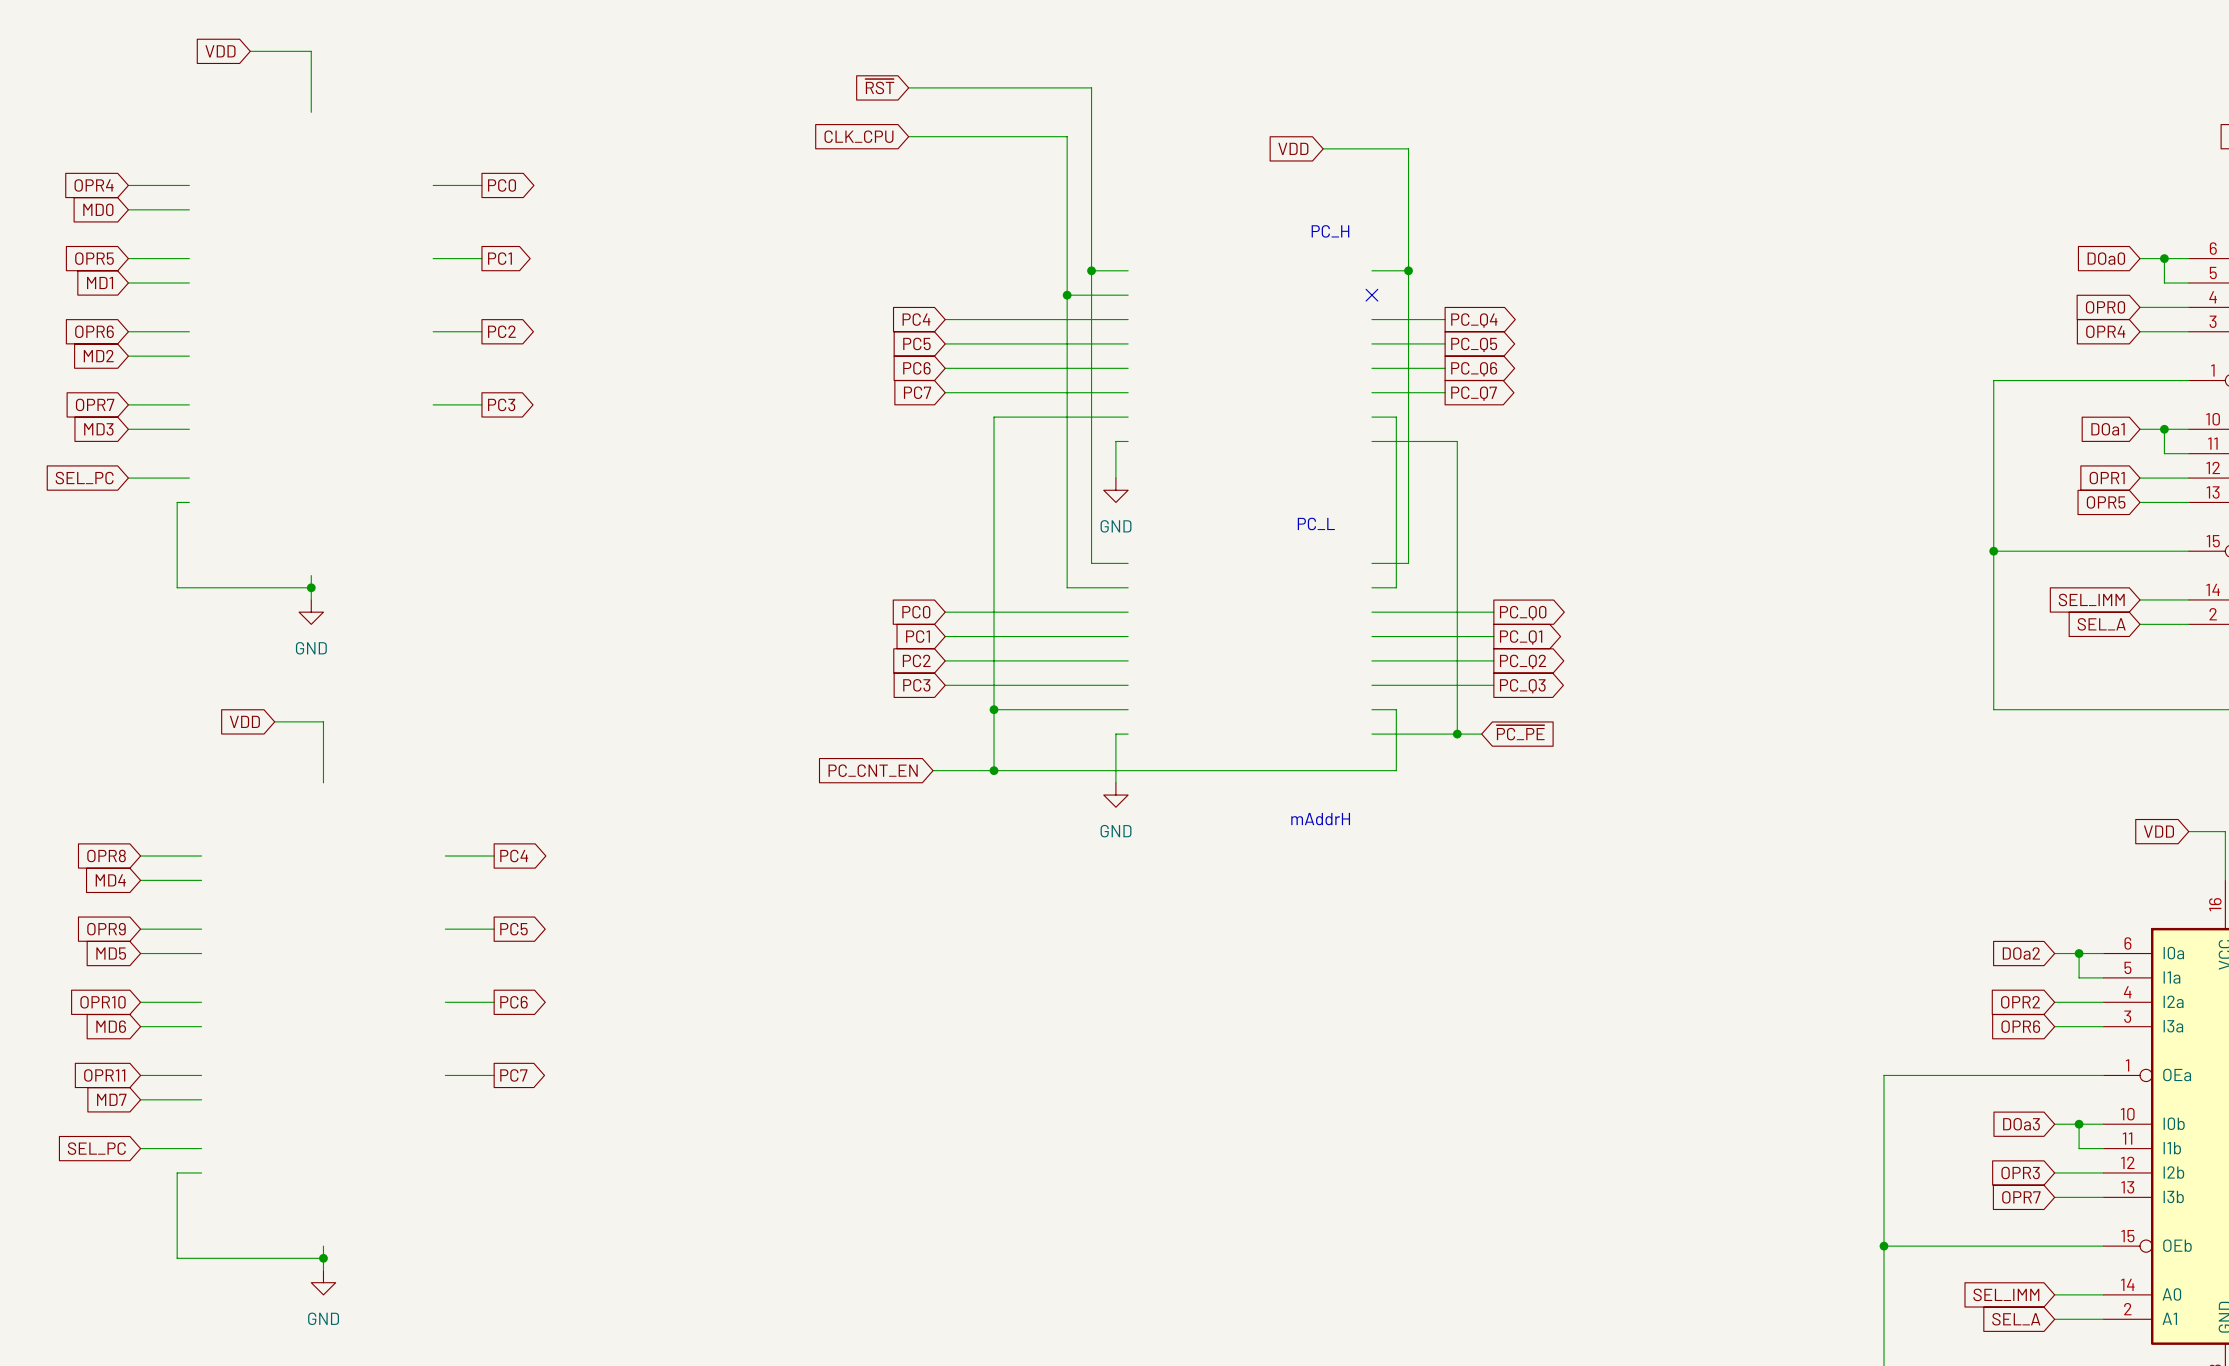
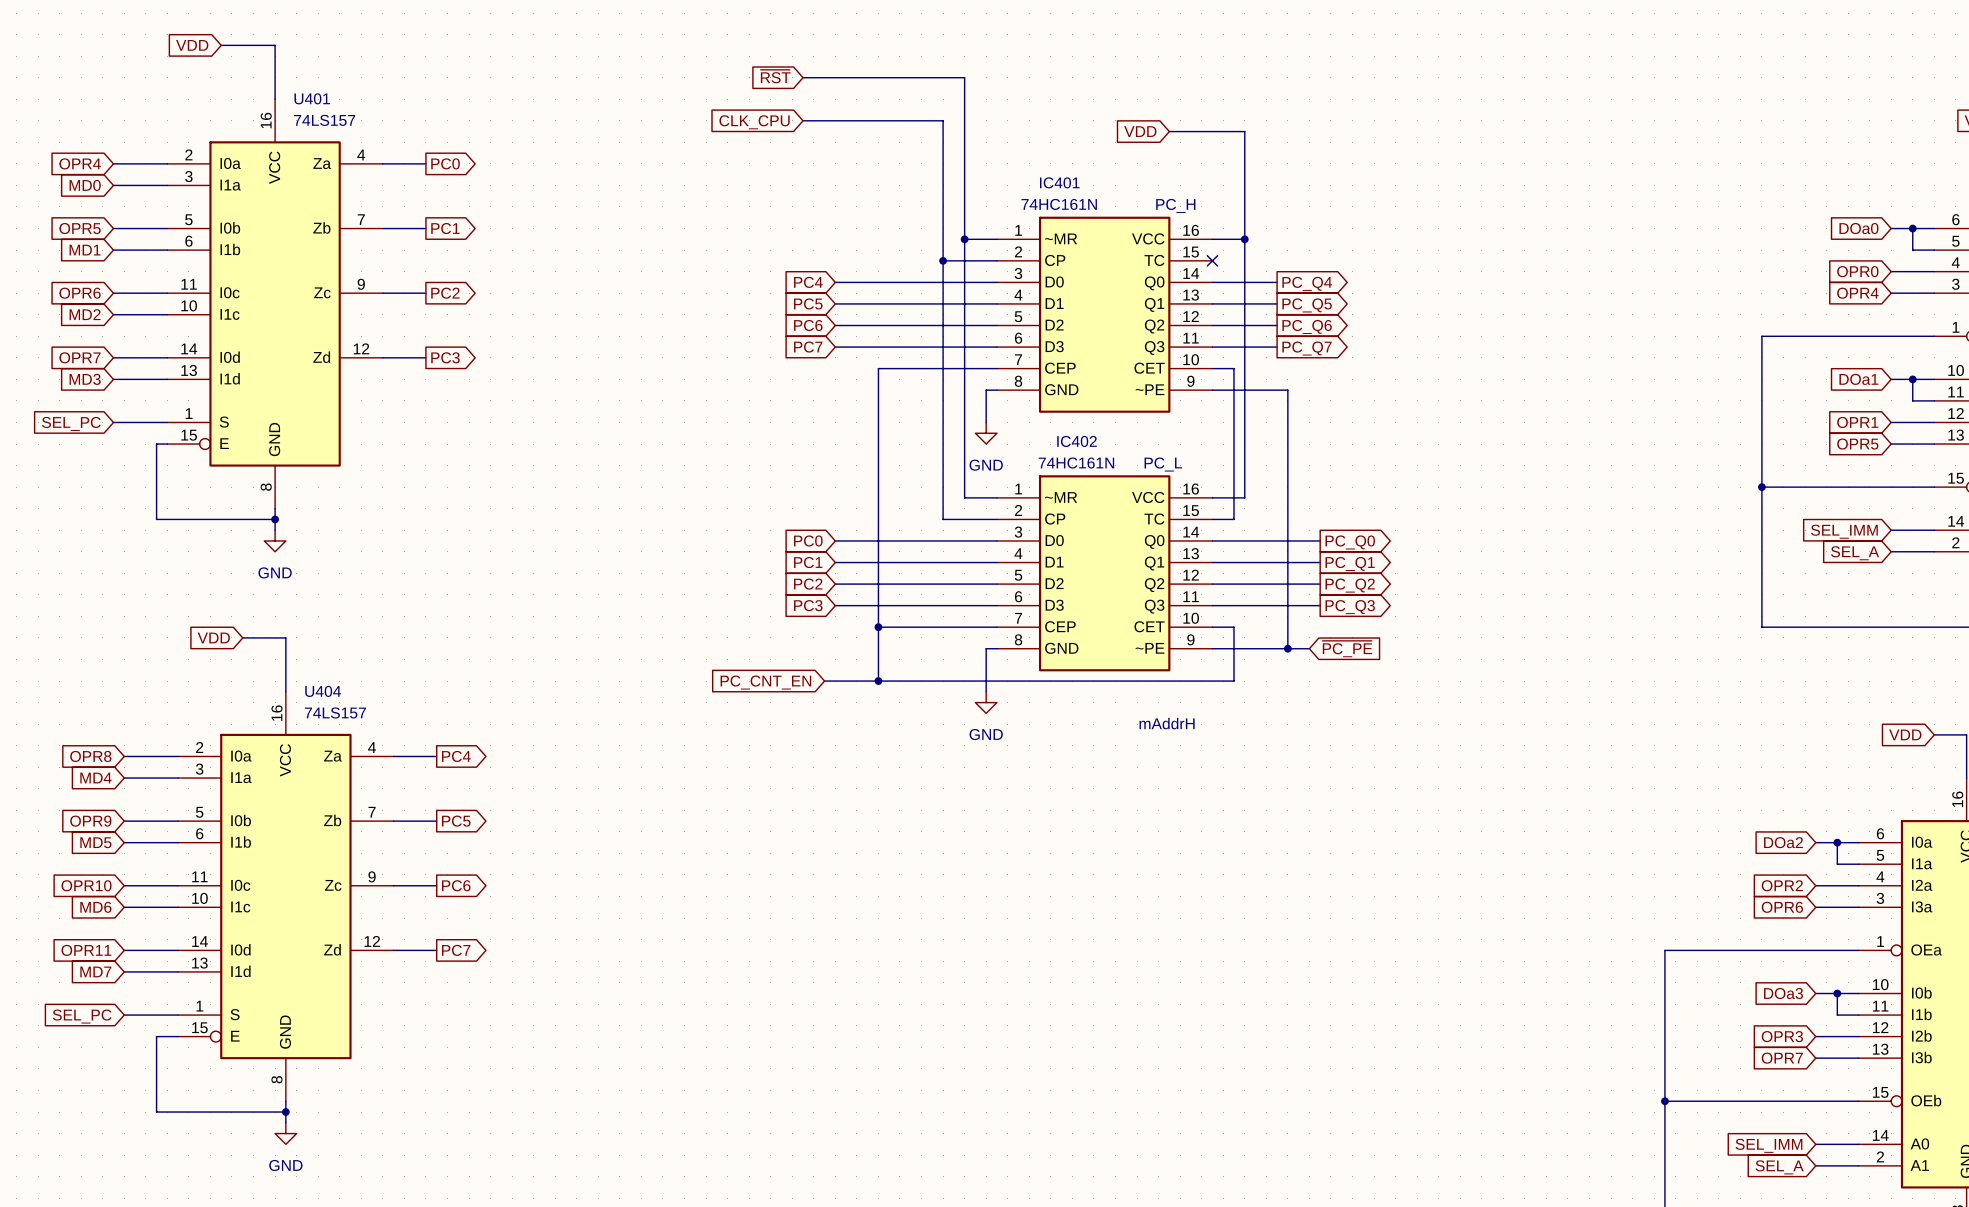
U401: none -> 74LS157 (275, 303)
IC401: none -> 74HC161N (1104, 314)
IC402: none -> 74HC161N (1104, 573)
U404: none -> 74LS157 (285, 896)

